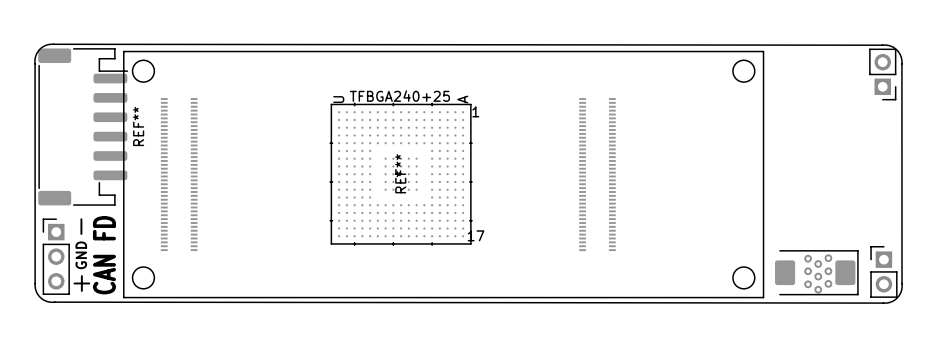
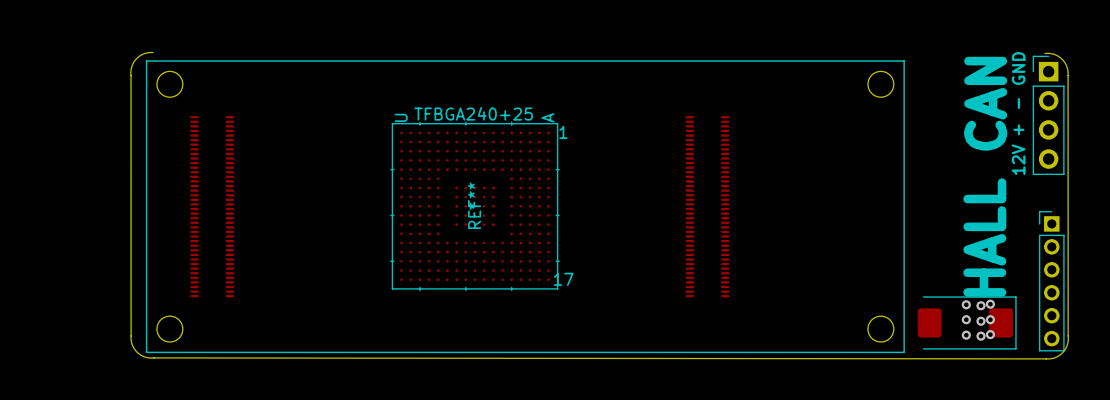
board edge: (882, 45) (47, 44) (38, 51) (34, 61) (35, 290) (40, 297) (50, 302) (130, 302) -> (153, 52) (138, 57) (130, 70) (131, 338) (134, 348) (139, 354) (154, 357)
text: none -> GND (1018, 68)
part: (882, 74) -> none
text: none -> CAN (985, 103)
text: none -> - (1018, 103)
part: none -> (1048, 115)
text: none -> + (1018, 129)
REF**: (83, 126) -> none
text: none -> 12V (1018, 159)
text: none -> HALL (984, 237)
text: - (81, 226) -> none
part: none -> (1051, 281)
text: GND (81, 255) -> none
CAN FD: (56, 256) -> none
via: none -> (990, 304)
via: none -> (966, 304)
via: (808, 258) -> none
via: (818, 264) -> none
via: none -> (966, 319)
via: none -> (990, 319)
via: (808, 271) -> none
part: (883, 271) -> none
via: (818, 276) -> none
via: none -> (990, 334)
text: + (81, 283) -> none
via: none -> (966, 335)
via: (808, 284) -> none
via: (818, 289) -> none

